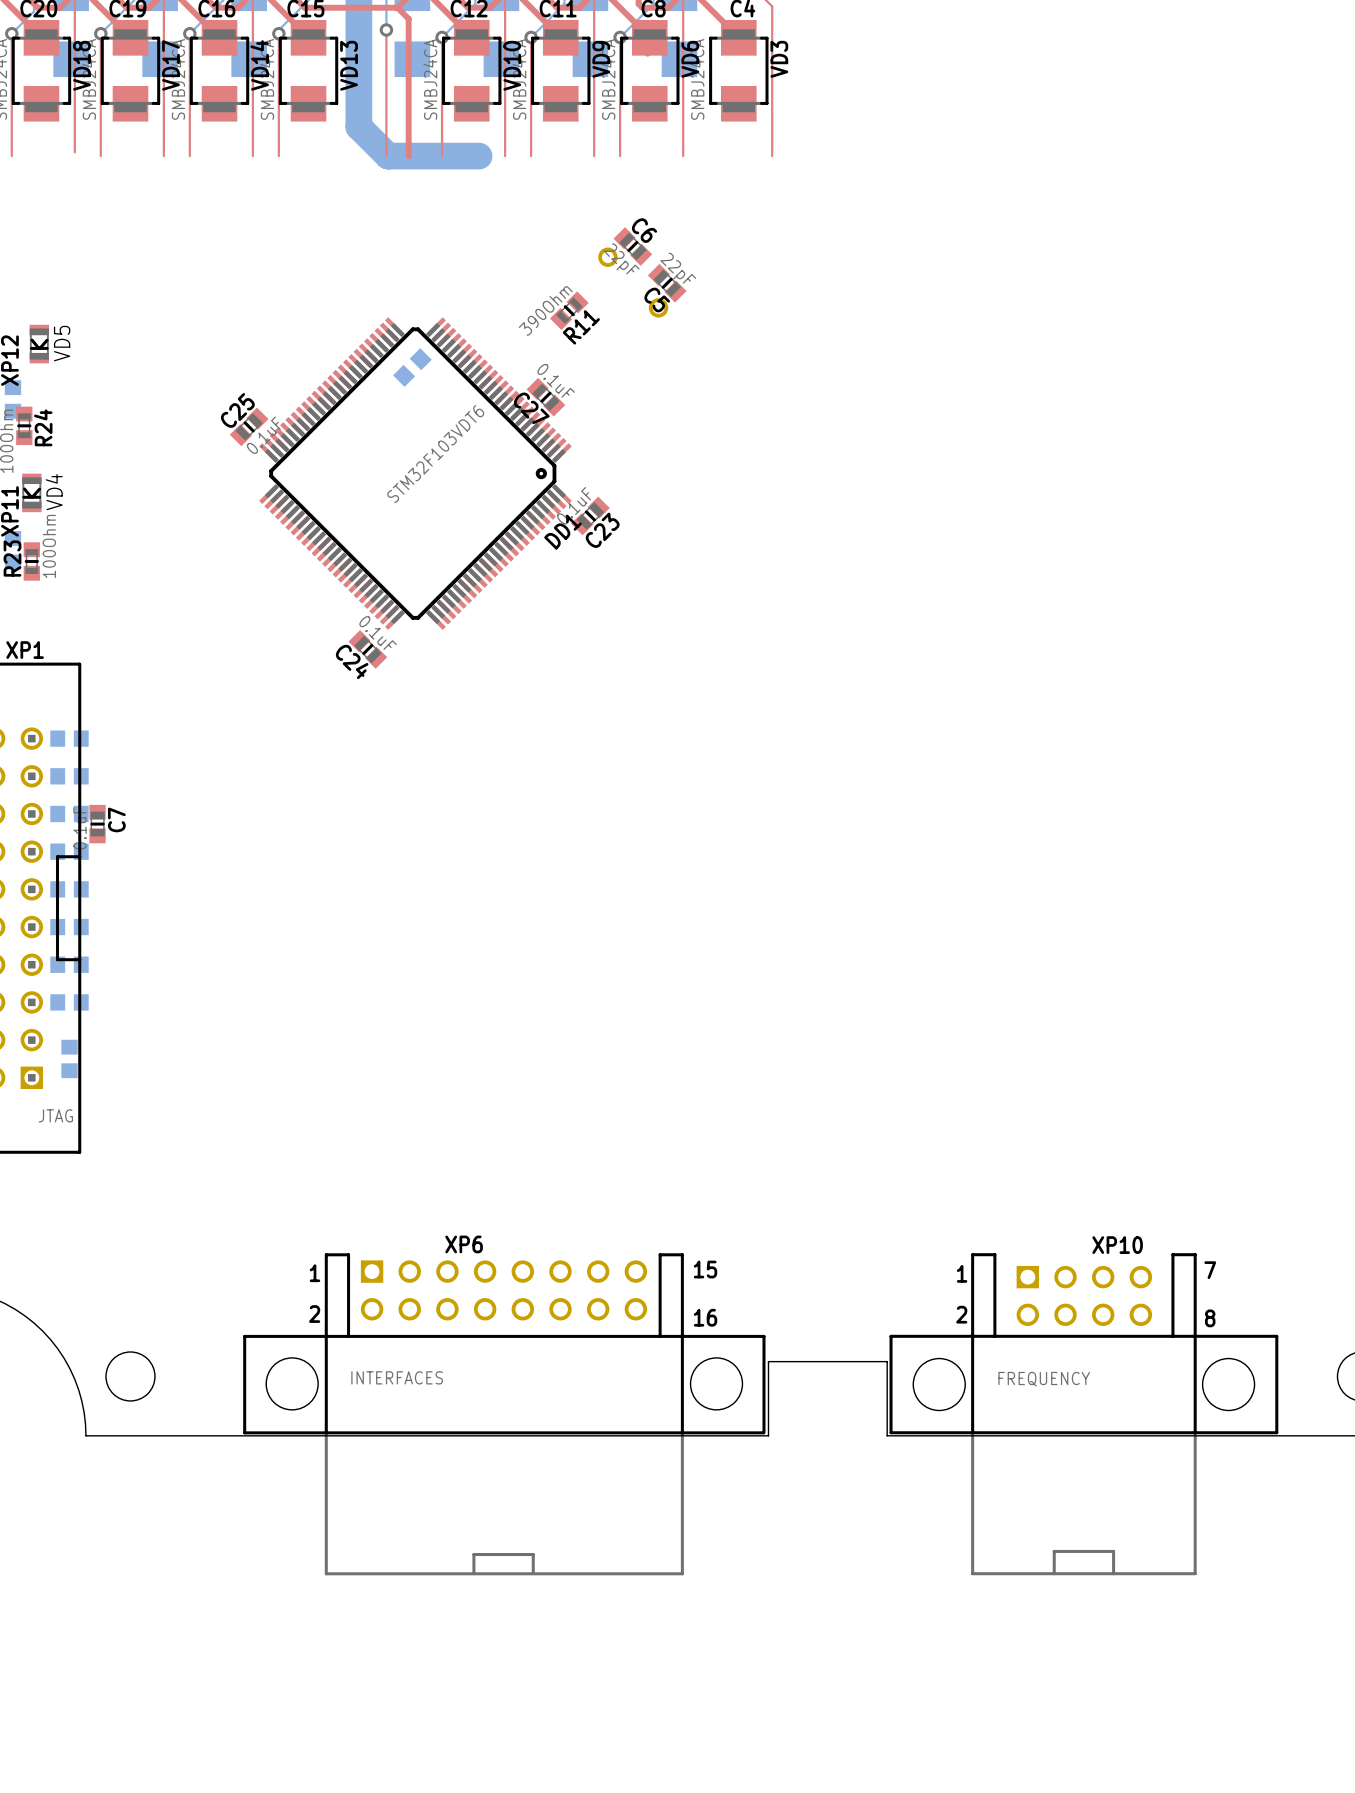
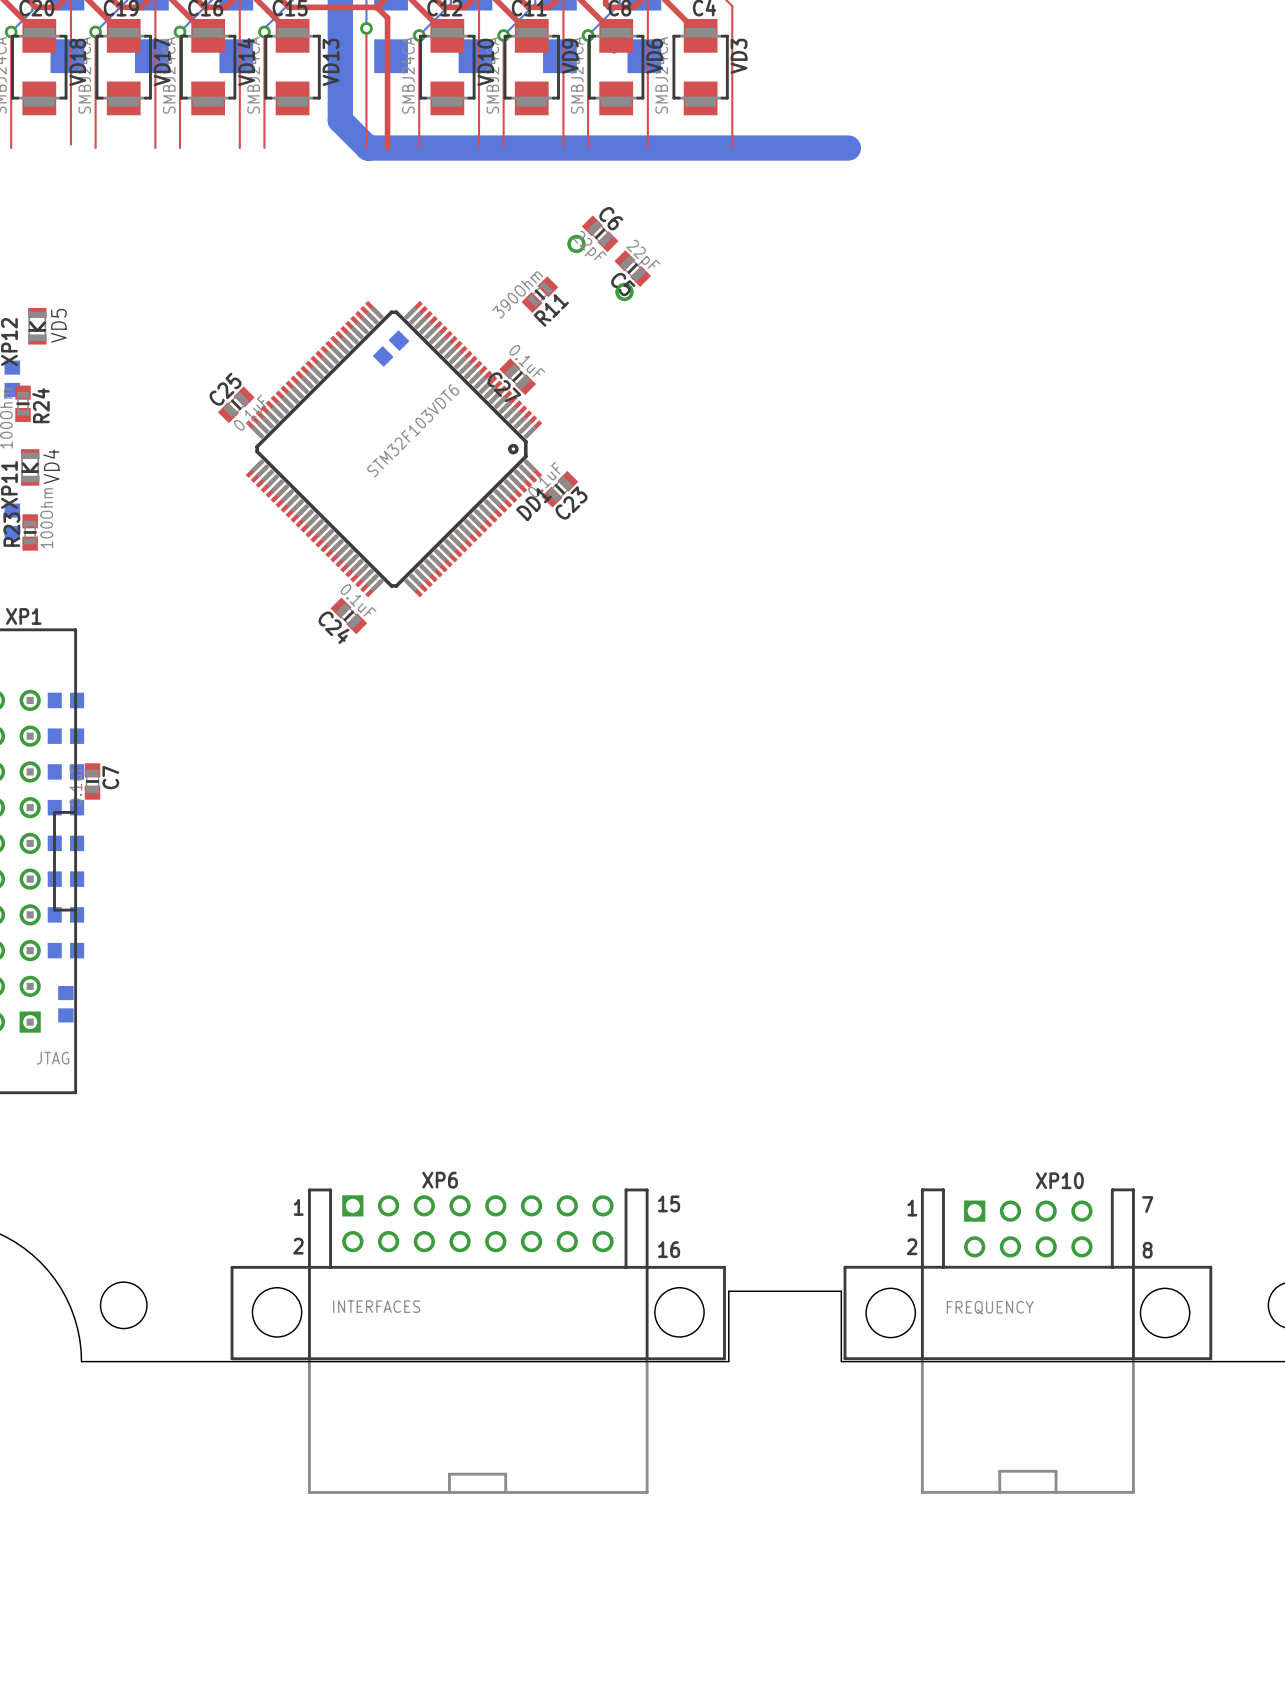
bottom track: none -> (454, 148) (848, 148)

